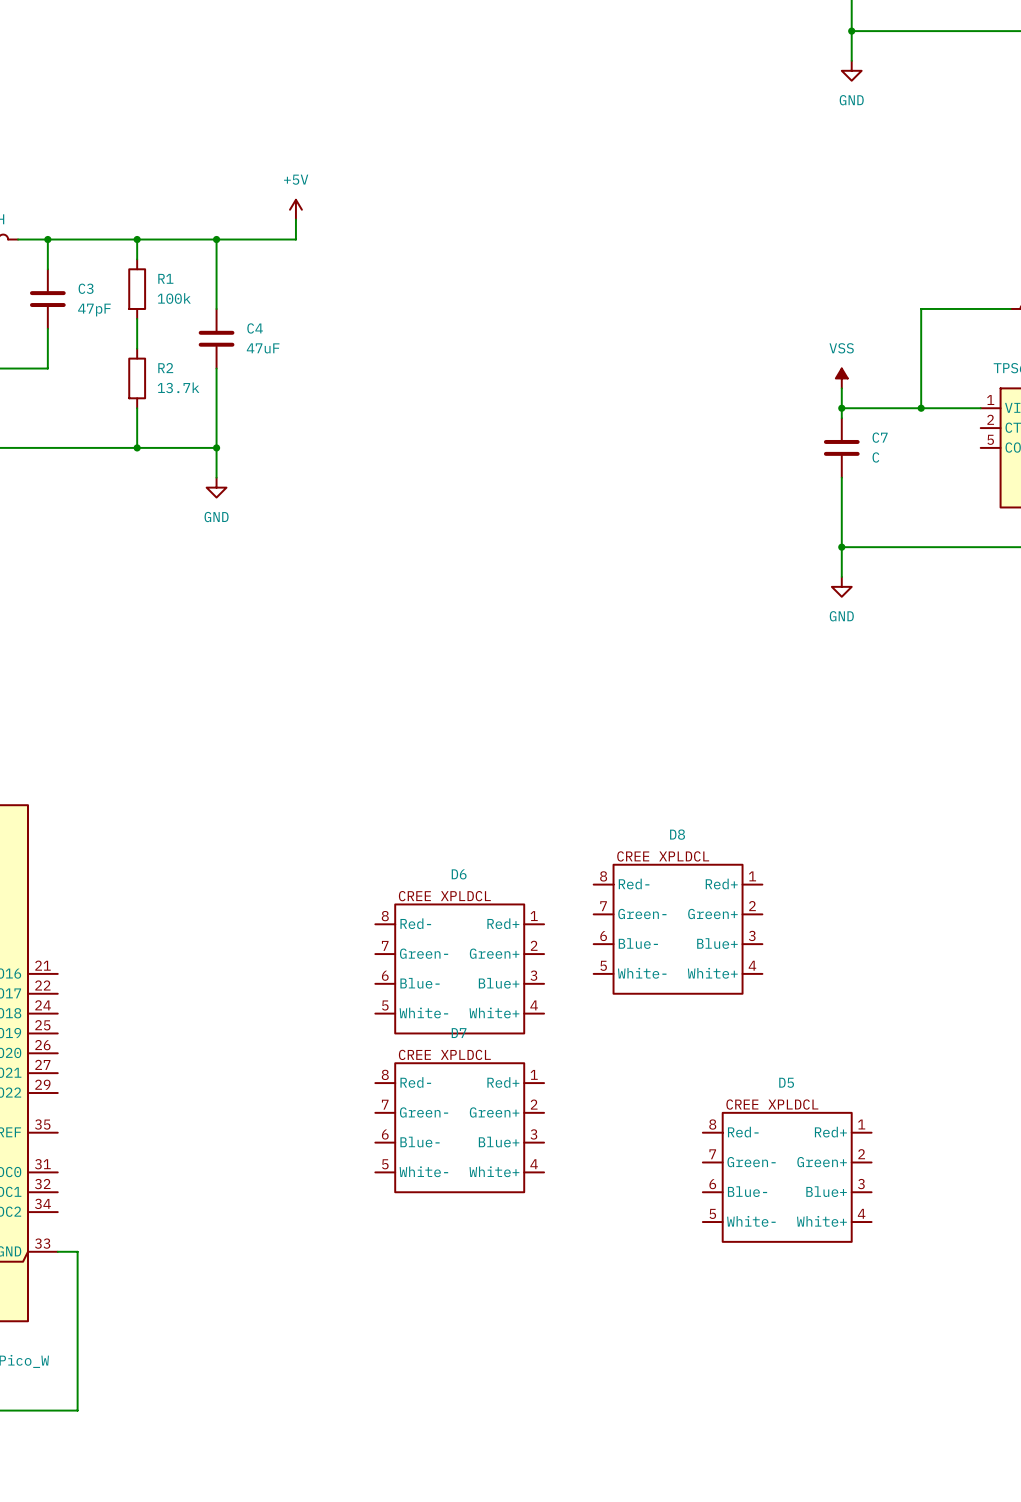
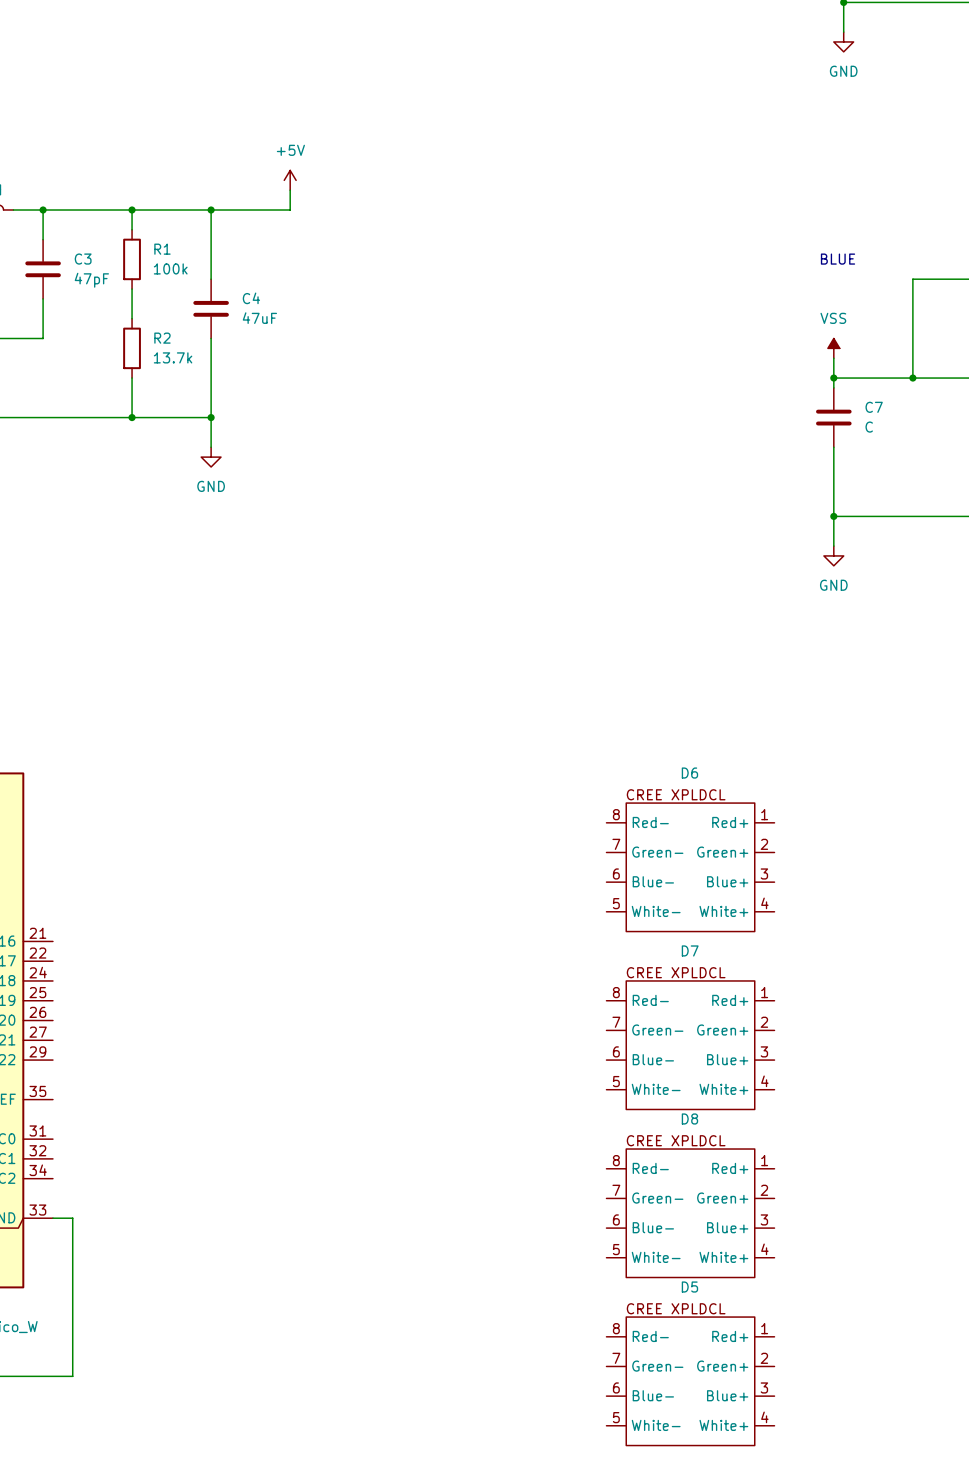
text: none -> BLUE (838, 259)
D8 position: (678, 929) -> (690, 1213)
D6 position: (459, 968) -> (690, 867)
D7 position: (459, 1127) -> (690, 1045)
D5 position: (787, 1177) -> (690, 1381)

